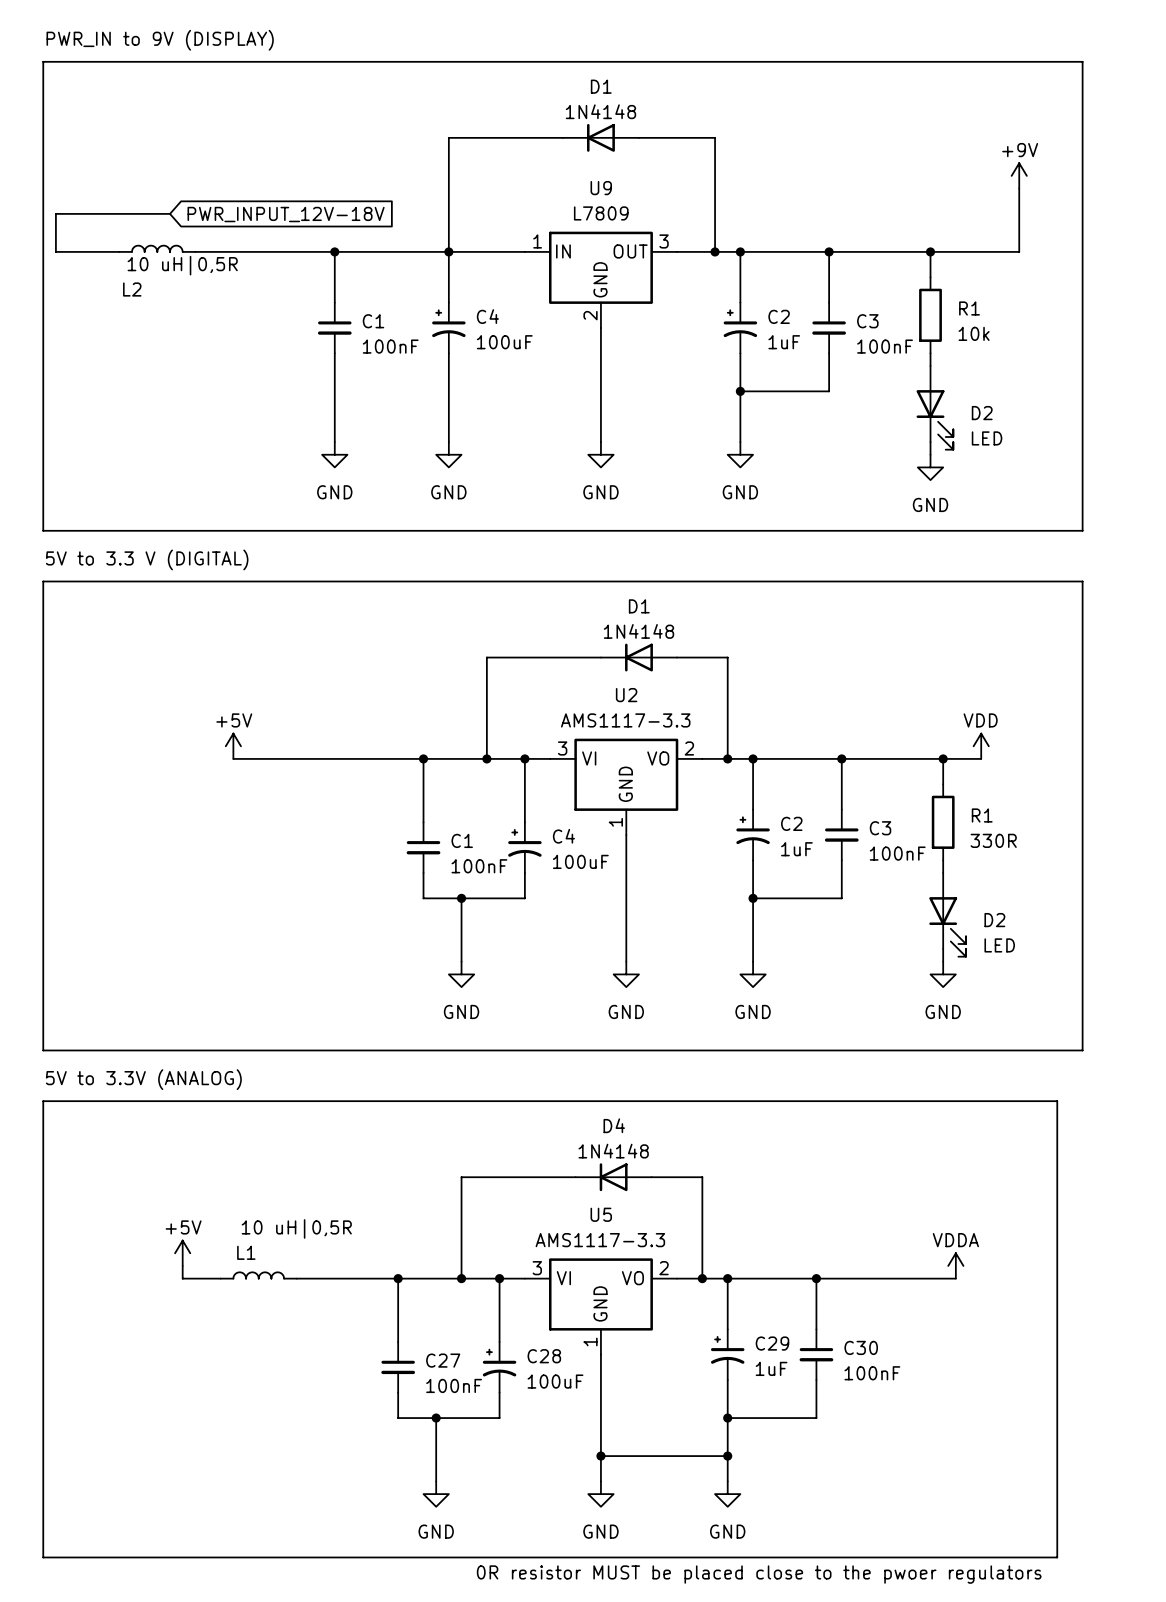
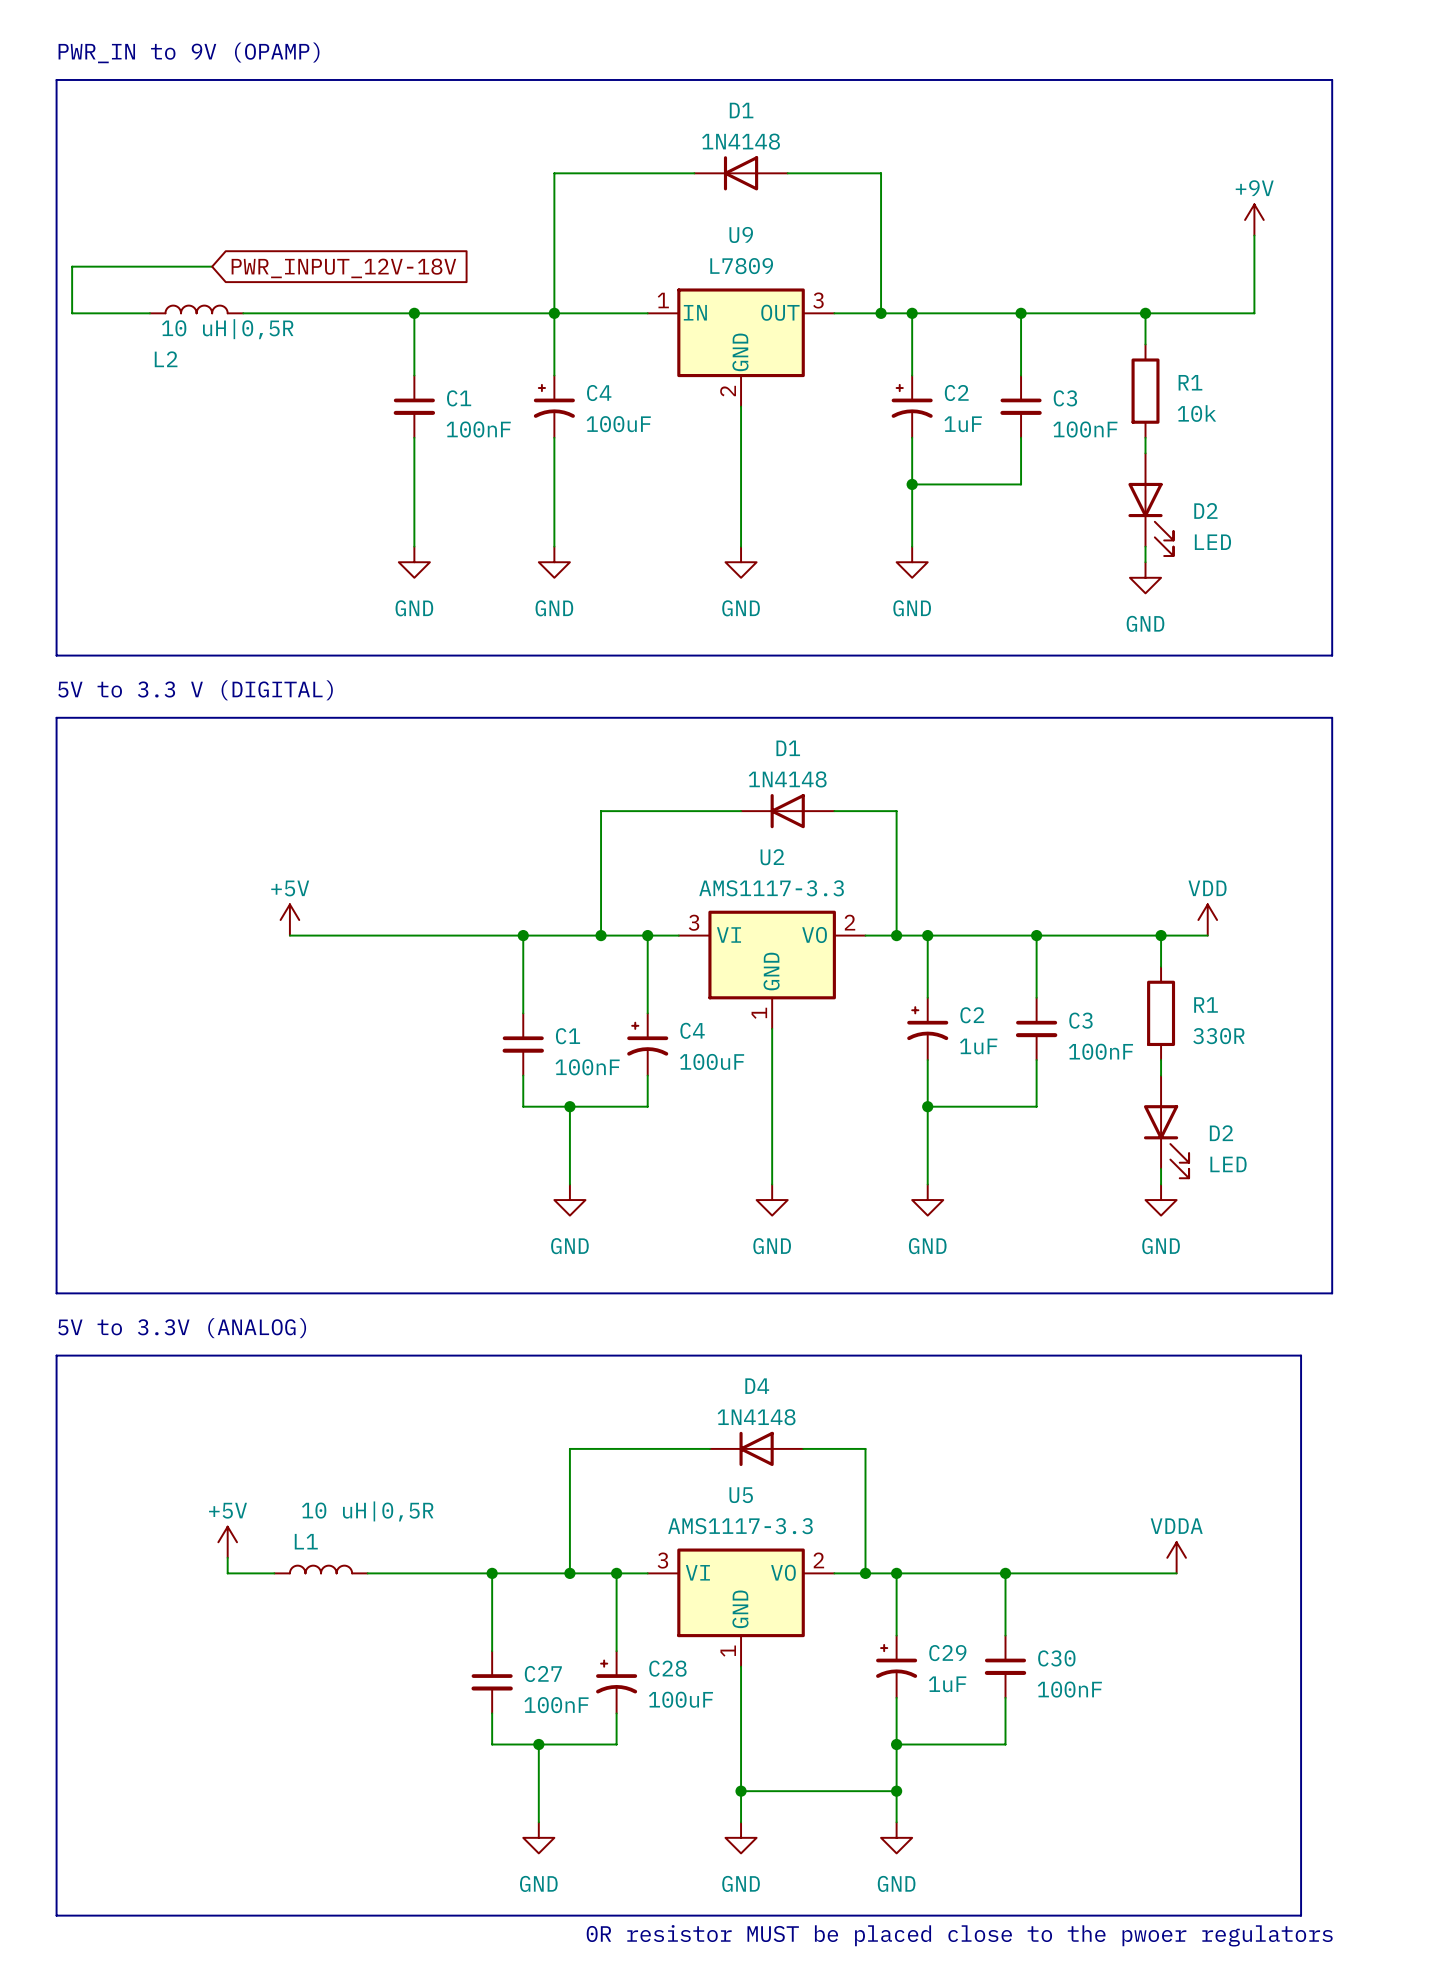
text: PWR_IN to 9V (DISPLAY) (160, 40) -> PWR_IN to 9V (OPAMP) (189, 52)

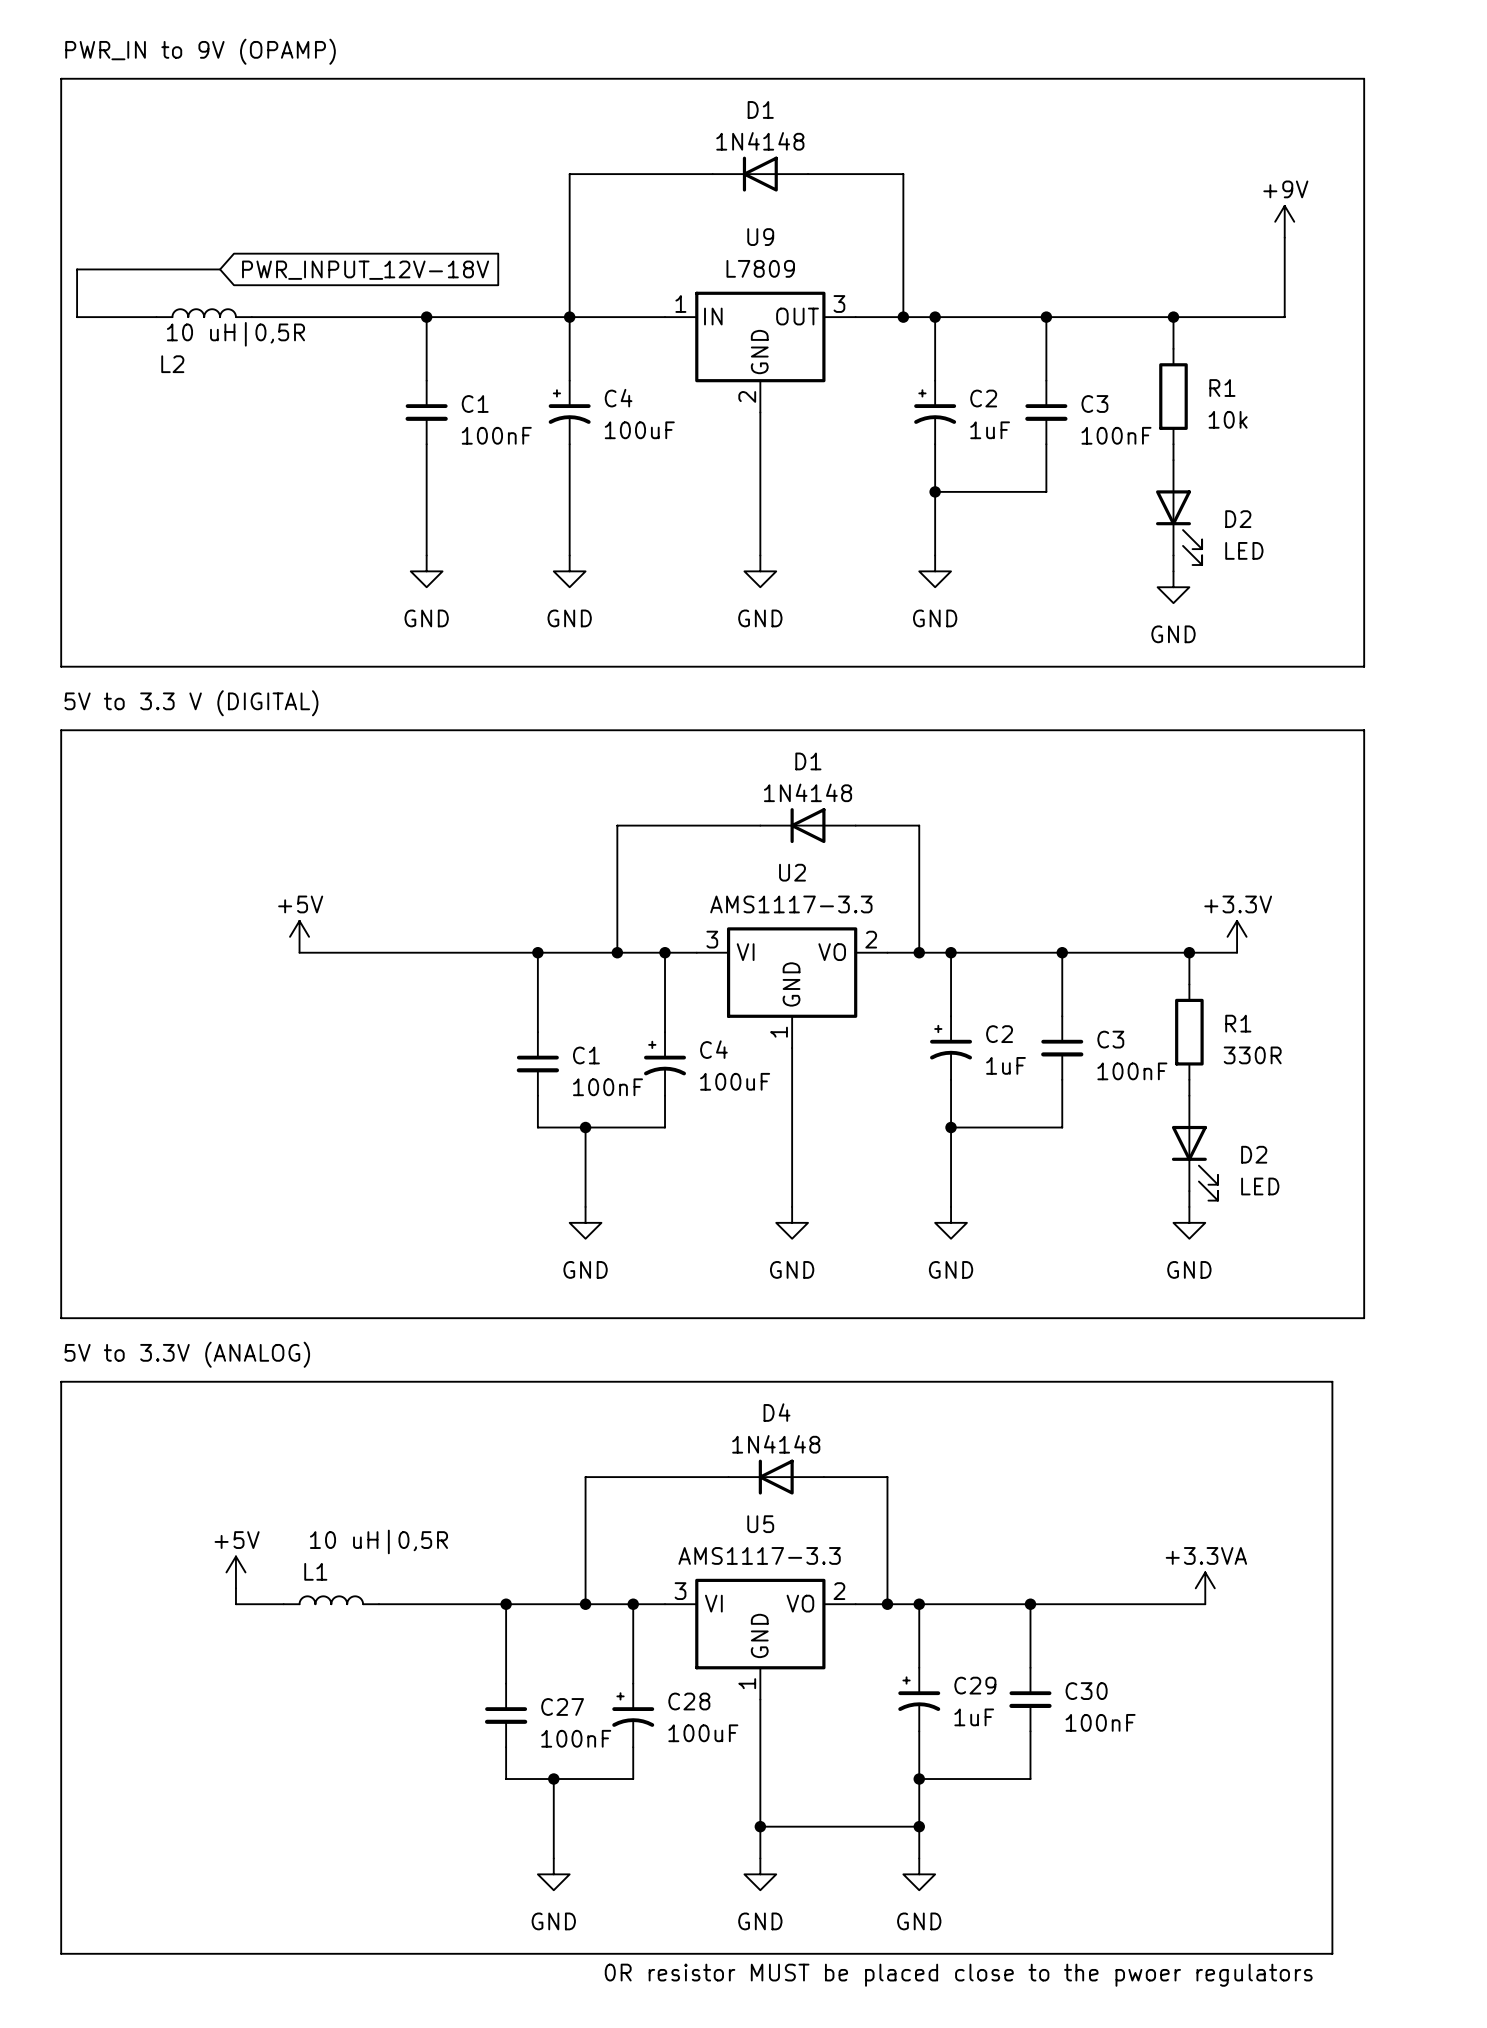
power symbol: VDD (1207, 920) -> +3.3V (1237, 936)
power symbol: VDDA (1176, 1557) -> +3.3VA (1205, 1588)

